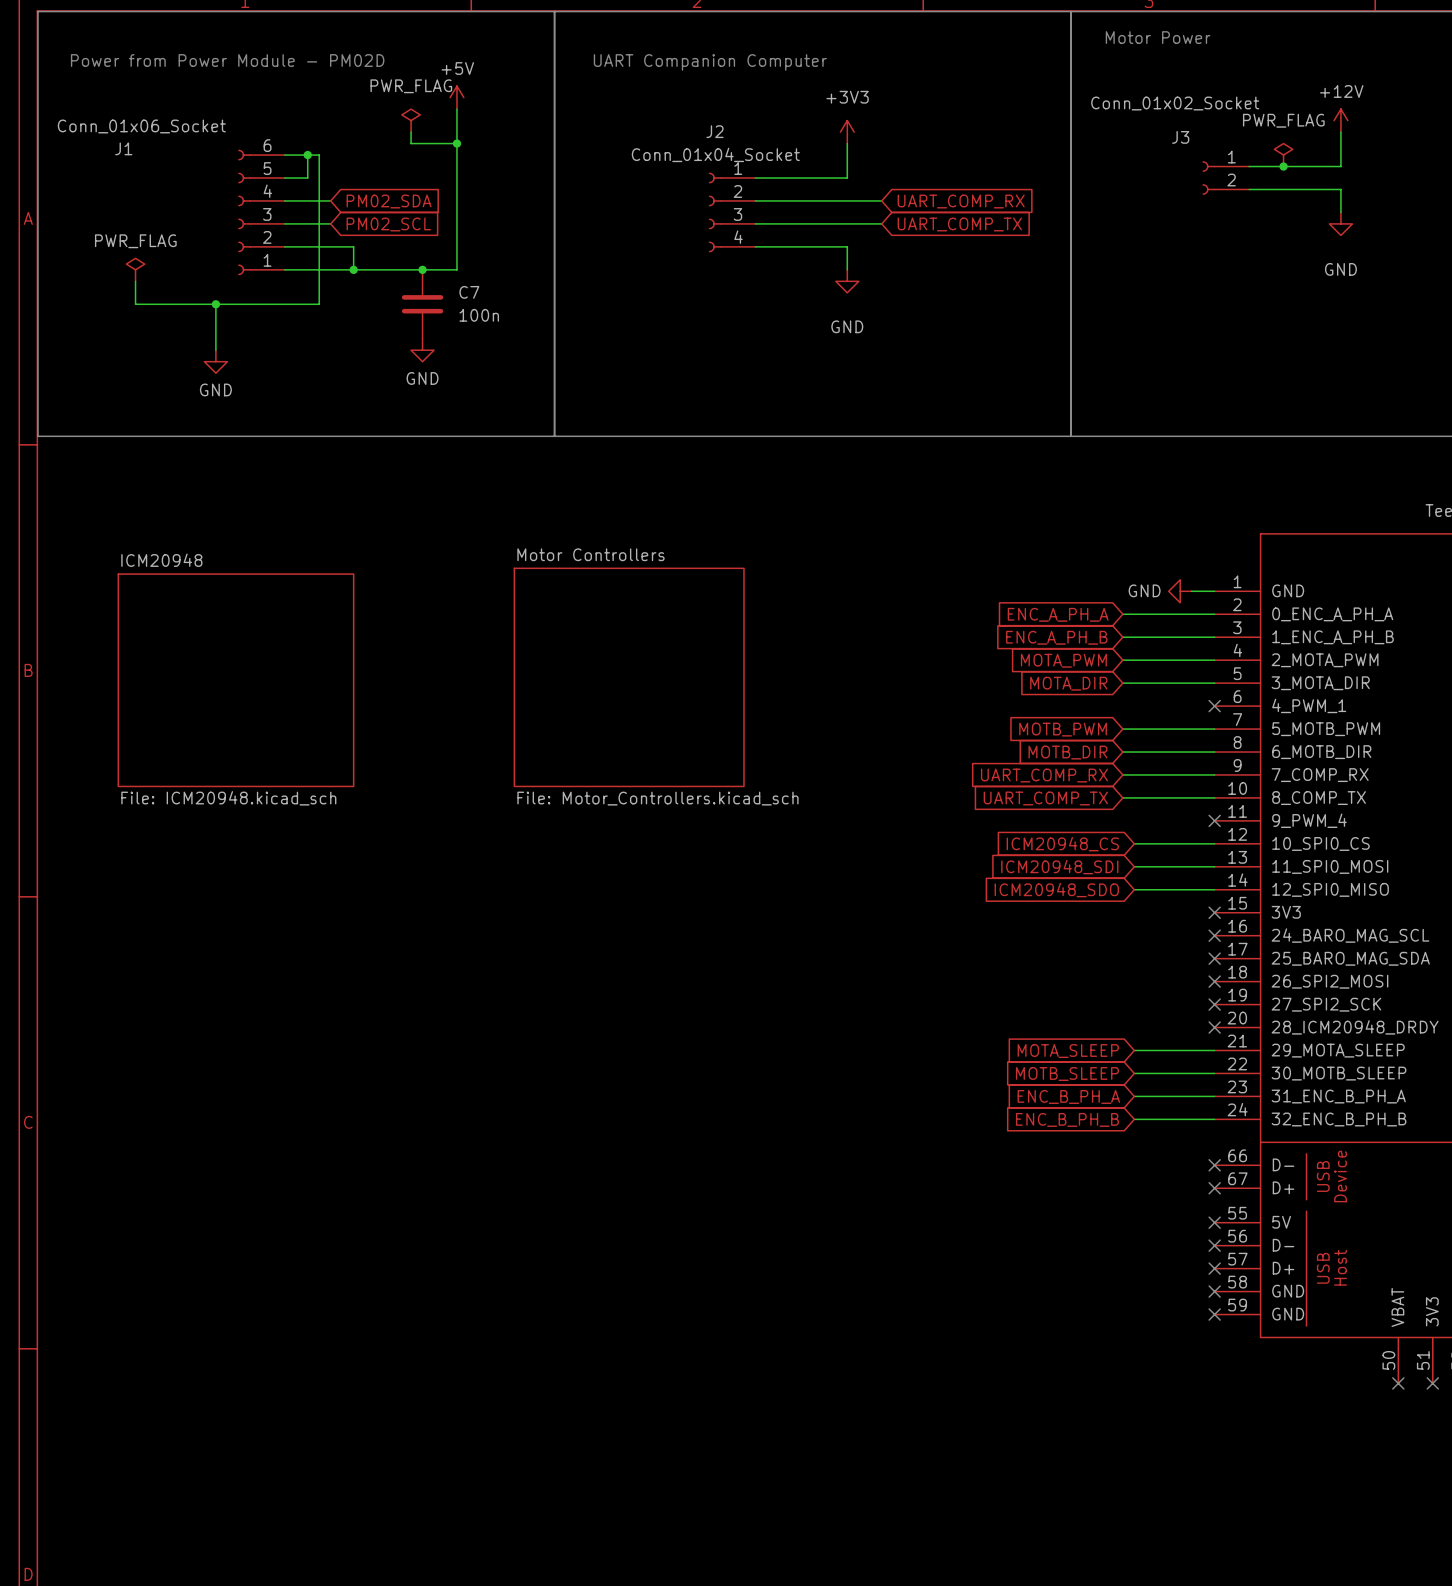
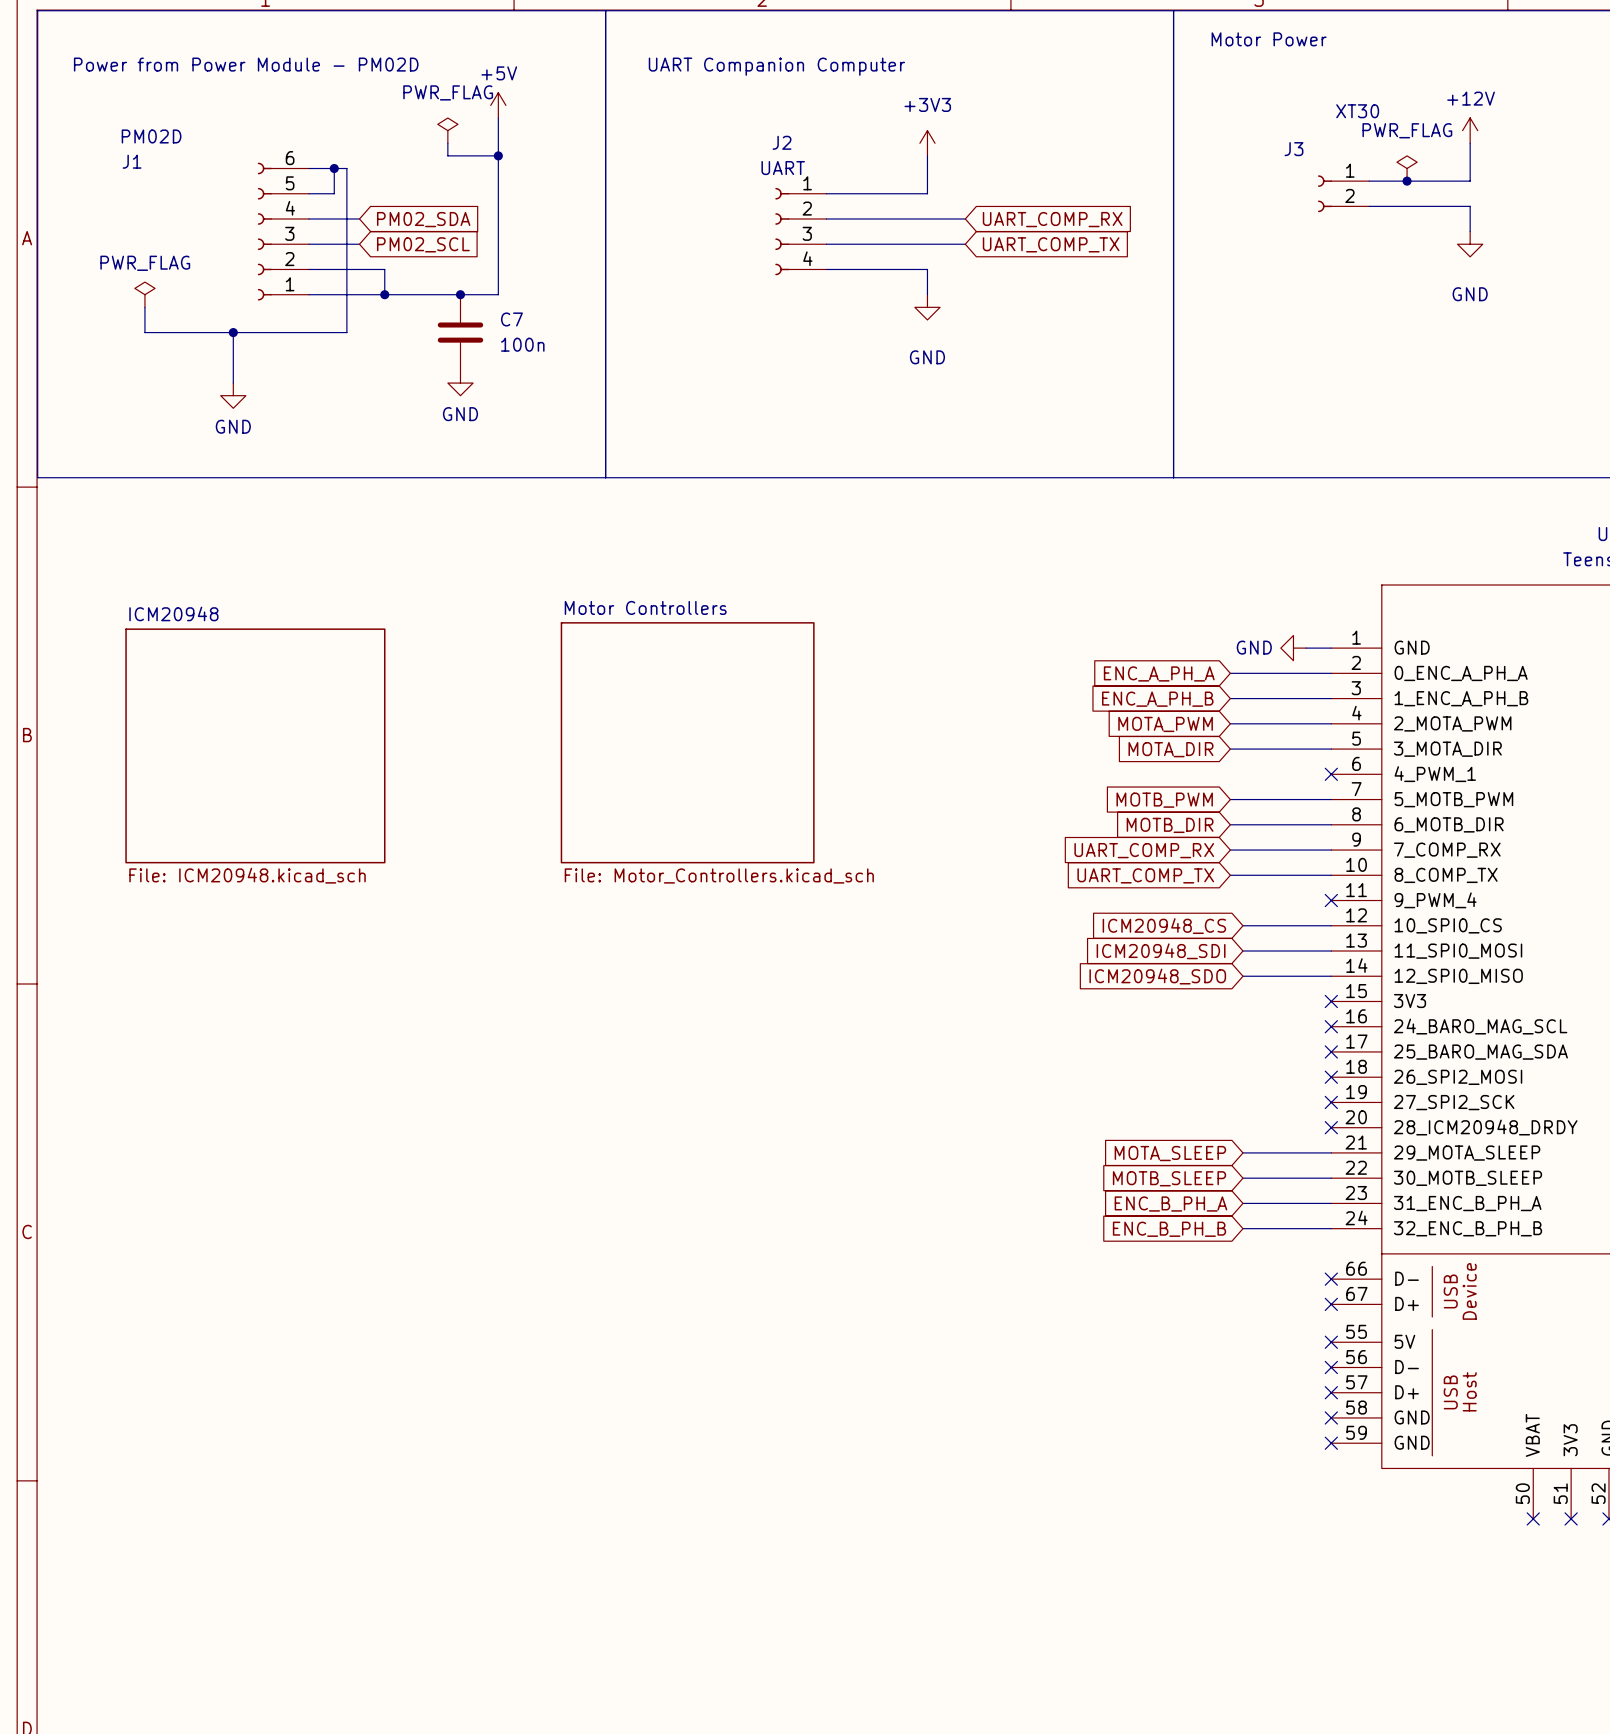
J3 value: Conn_01x02_Socket (1175, 103) -> XT30 (1357, 111)
J1 value: Conn_01x06_Socket (141, 126) -> PM02D (151, 136)
J2 value: Conn_01x04_Socket (715, 154) -> UART (783, 168)

